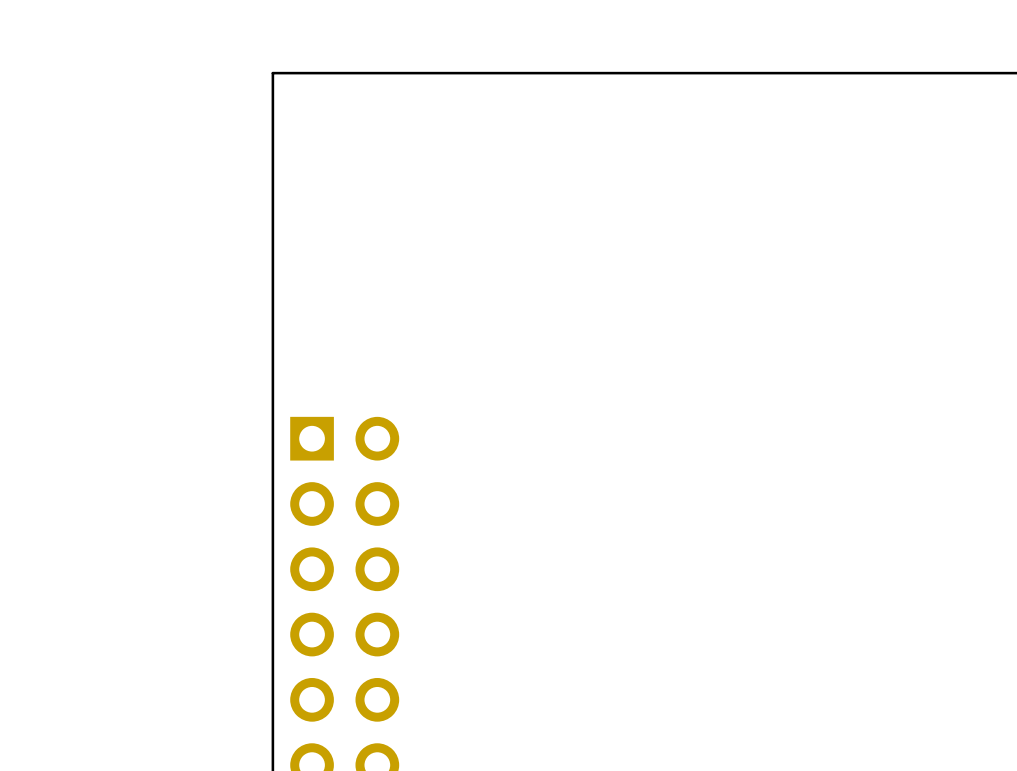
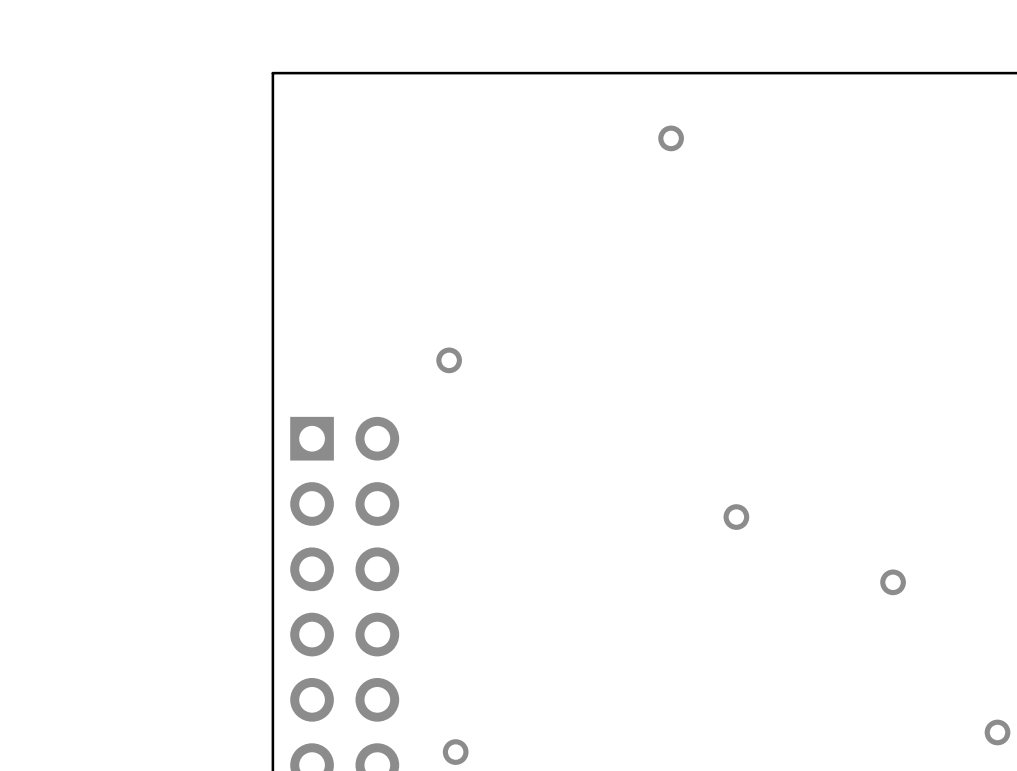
via: none -> (671, 138)
via: none -> (449, 360)
via: none -> (736, 517)
via: none -> (893, 582)
via: none -> (997, 732)
via: none -> (455, 752)

